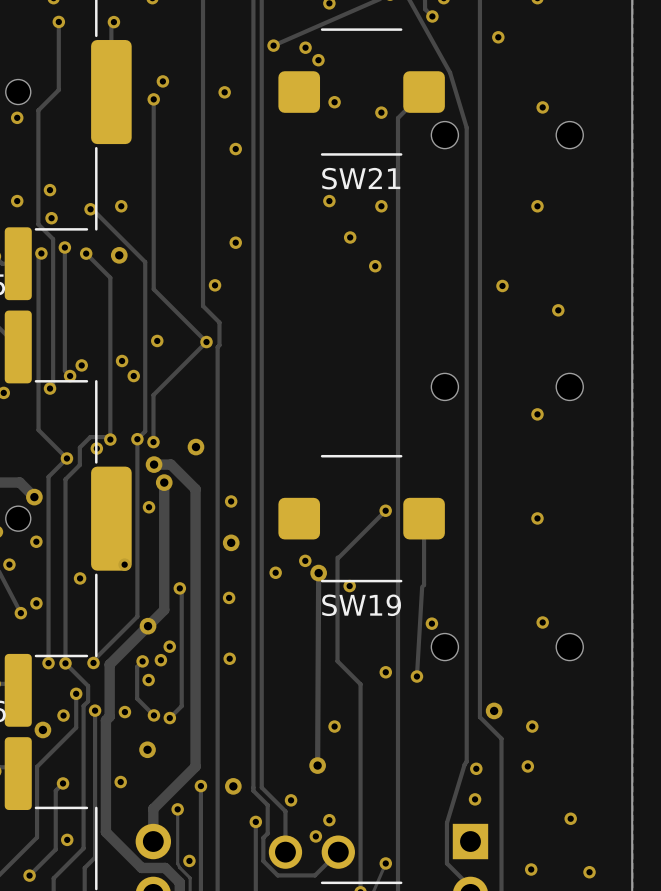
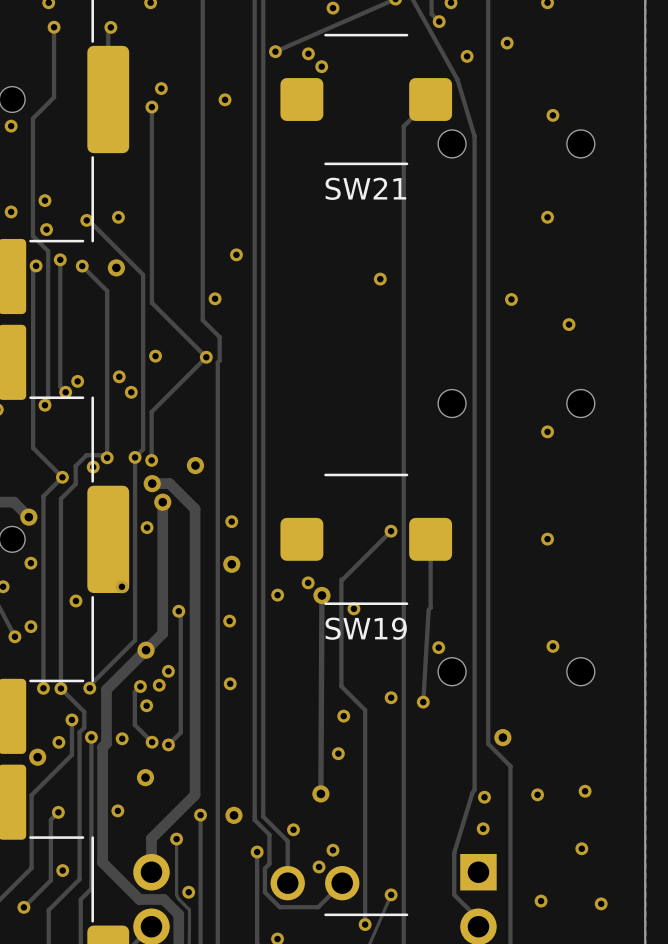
via: none -> (467, 56)
via: (334, 102) -> none
via: (381, 112) -> none
via: (235, 149) -> none
via: (329, 201) -> none
via: (381, 206) -> none
via: (350, 237) -> none
via: none -> (343, 716)
via position: (532, 726) -> (585, 791)

